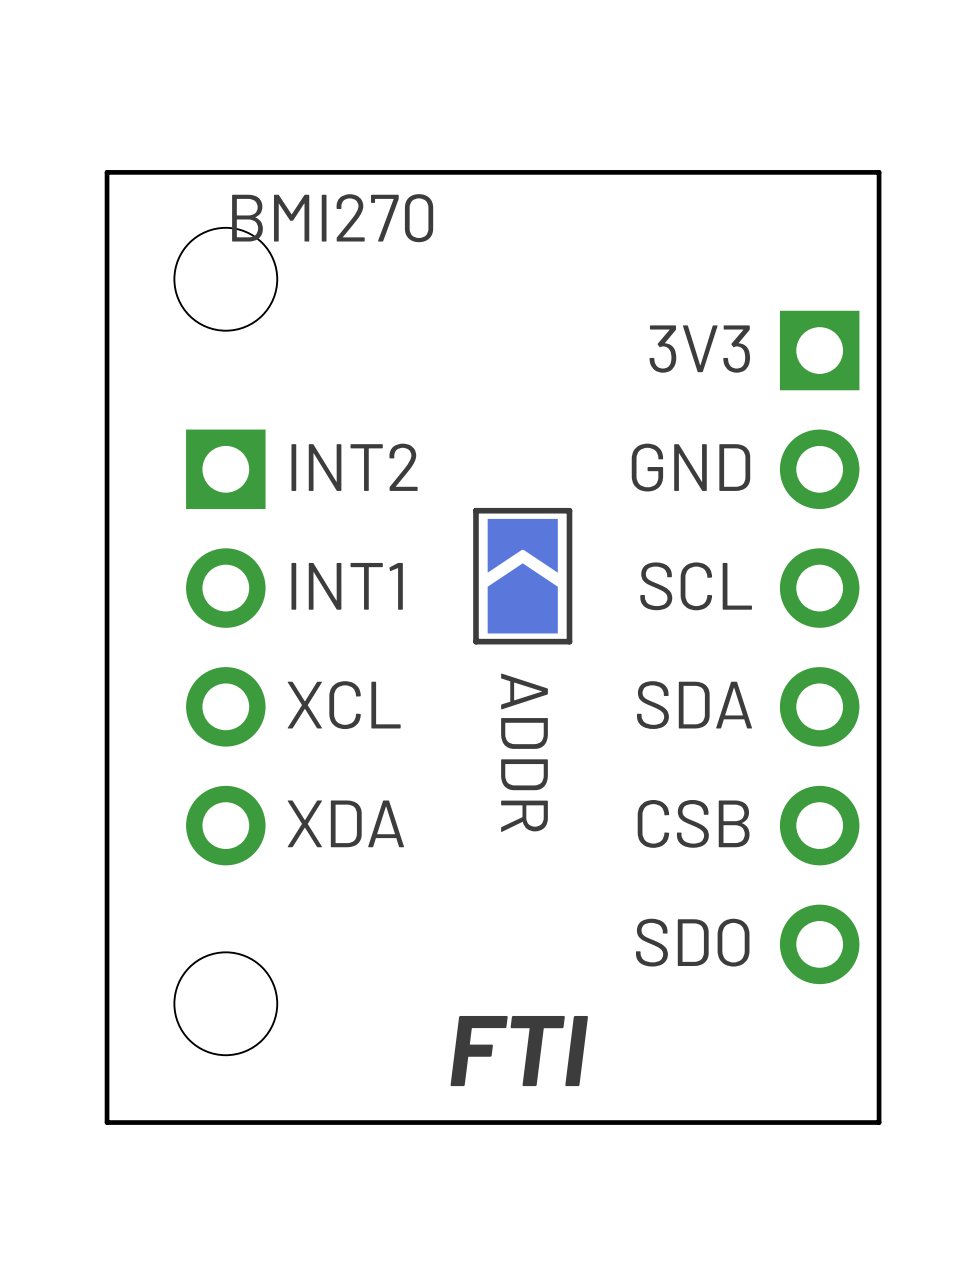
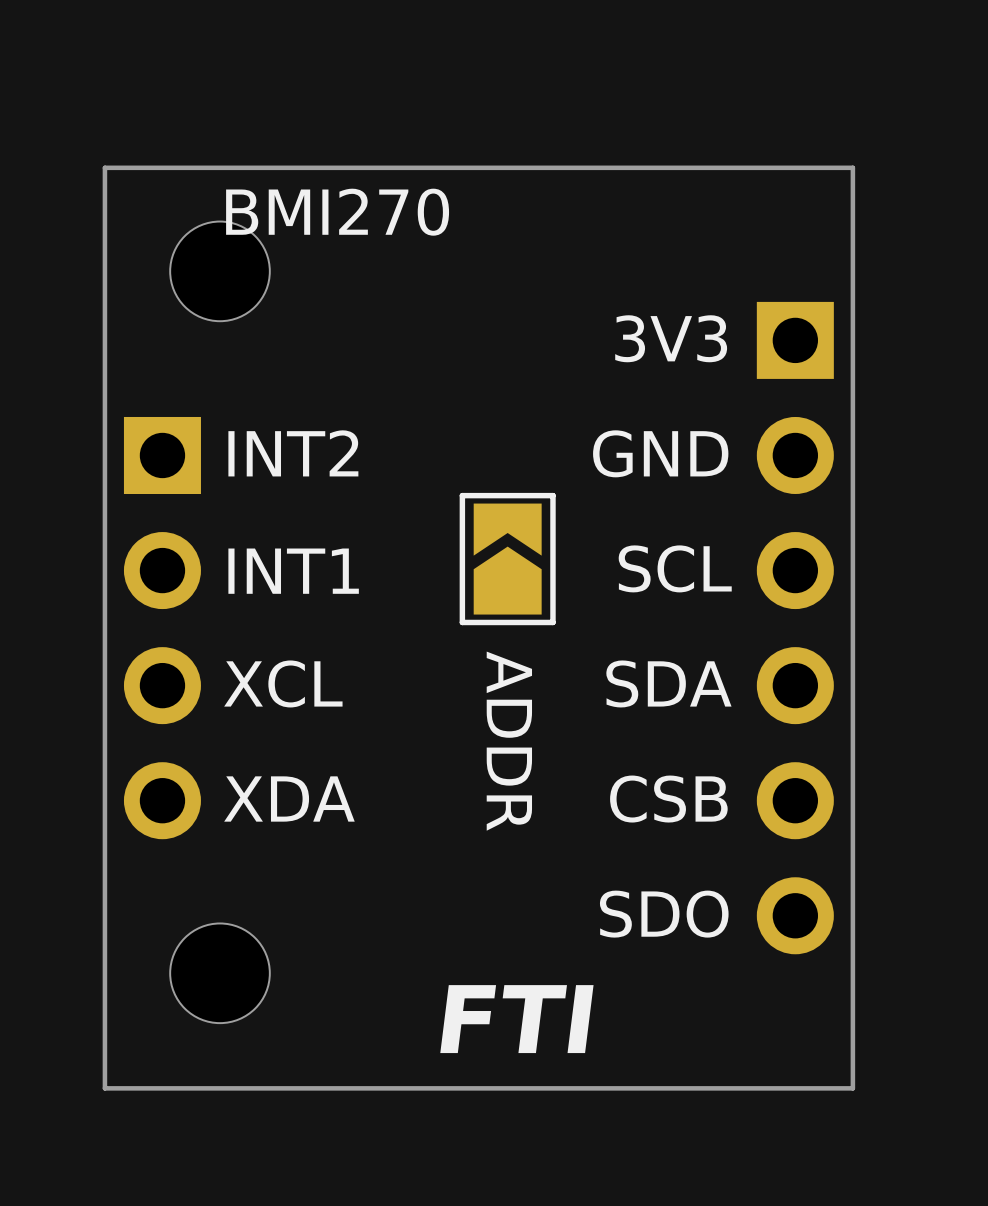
text position: INT2 (354, 467) -> INT2 (293, 453)
text position: INT1 (347, 586) -> INT1 (293, 571)
part position: (225, 647) -> (162, 628)
text position: XCL (344, 705) -> XCL (283, 683)
text position: XDA (345, 823) -> XDA (289, 799)

